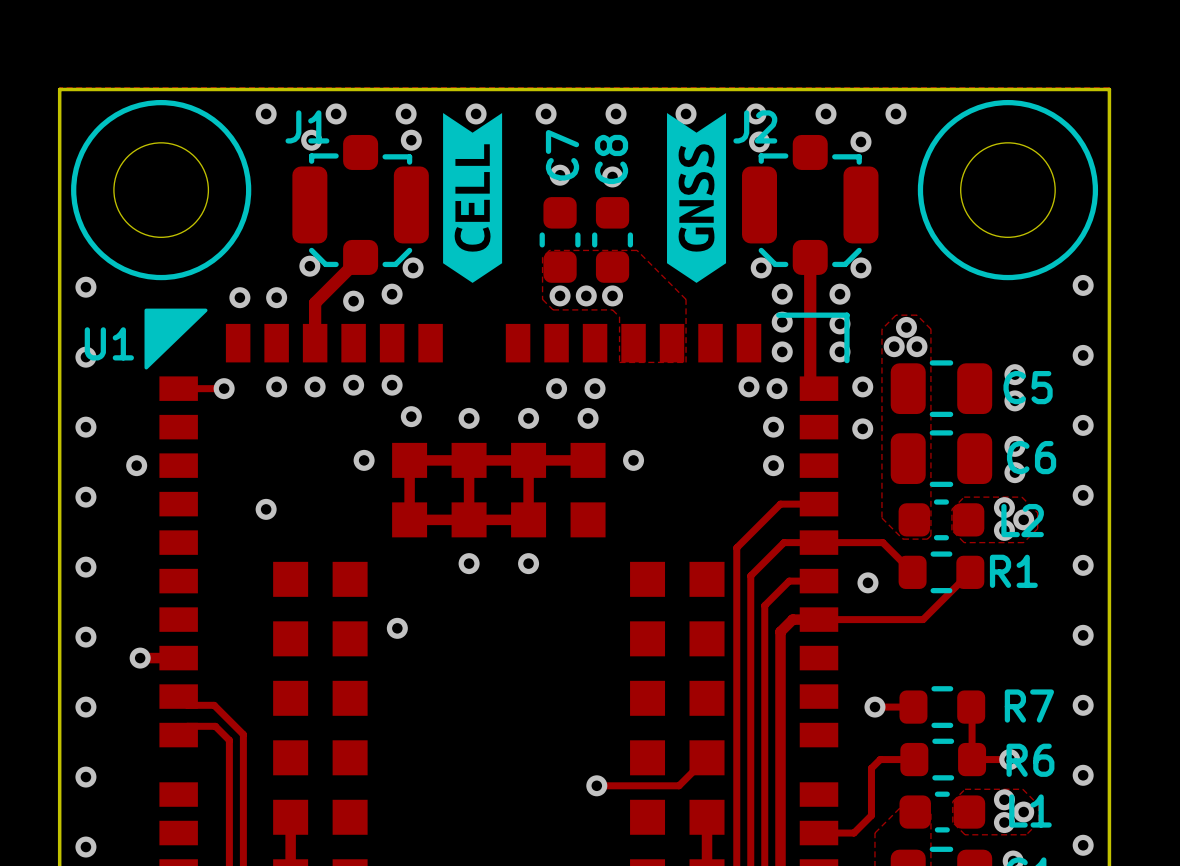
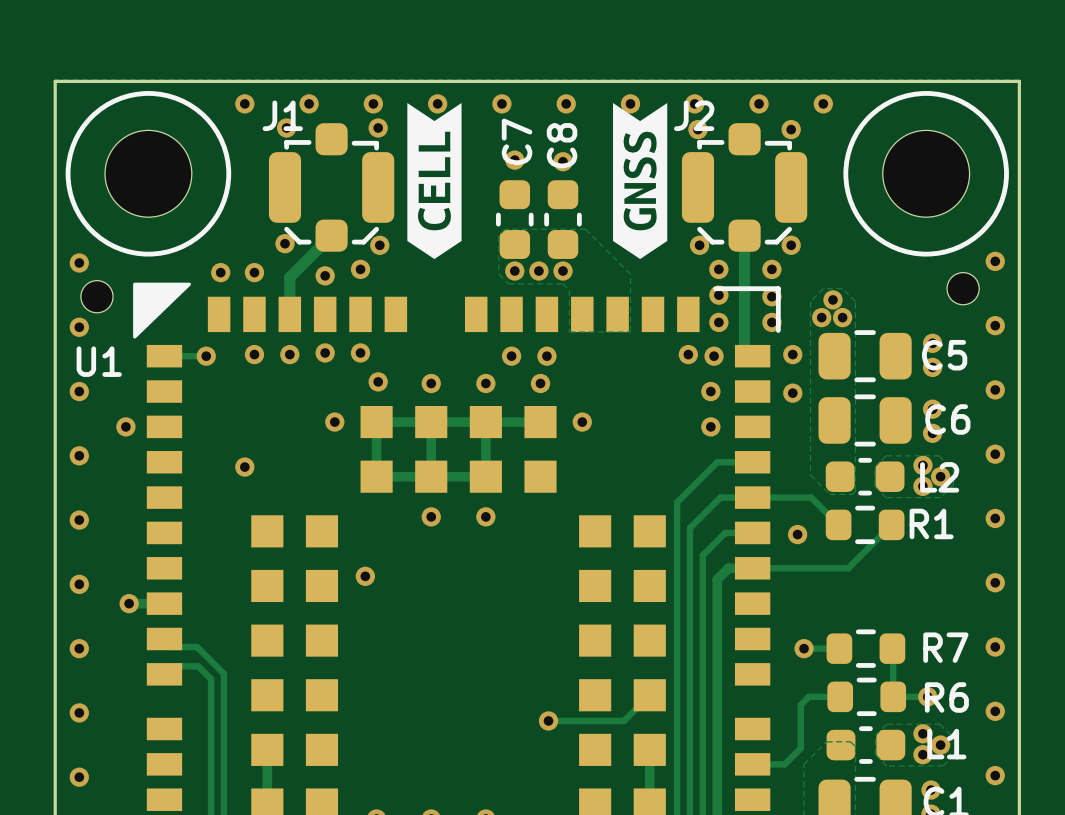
part: none -> (963, 288)
part: none -> (96, 296)
U1 name position: U1 (109, 343) -> U1 (99, 361)

